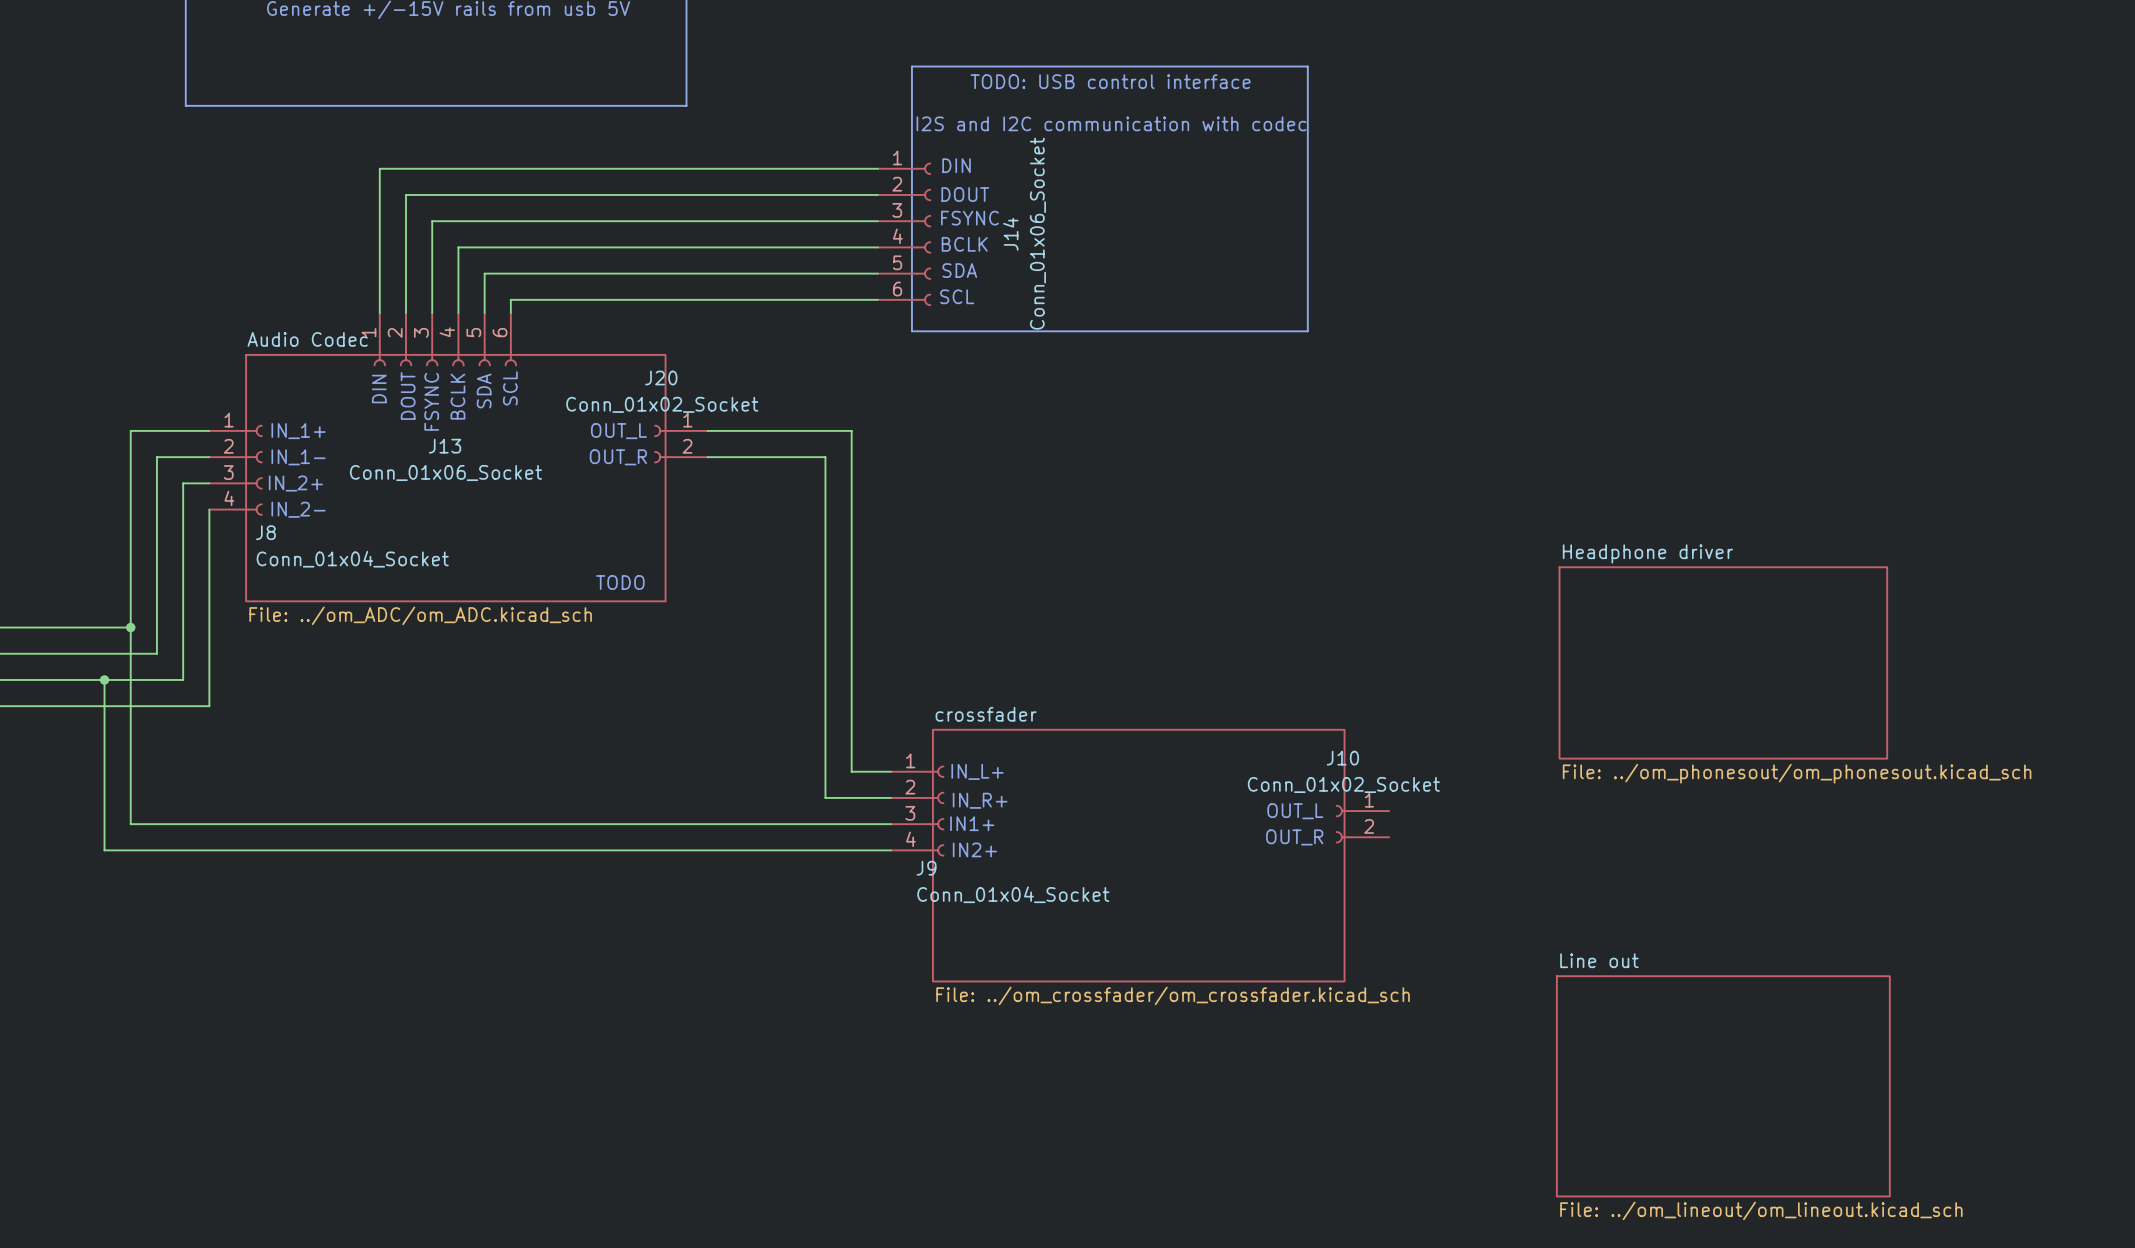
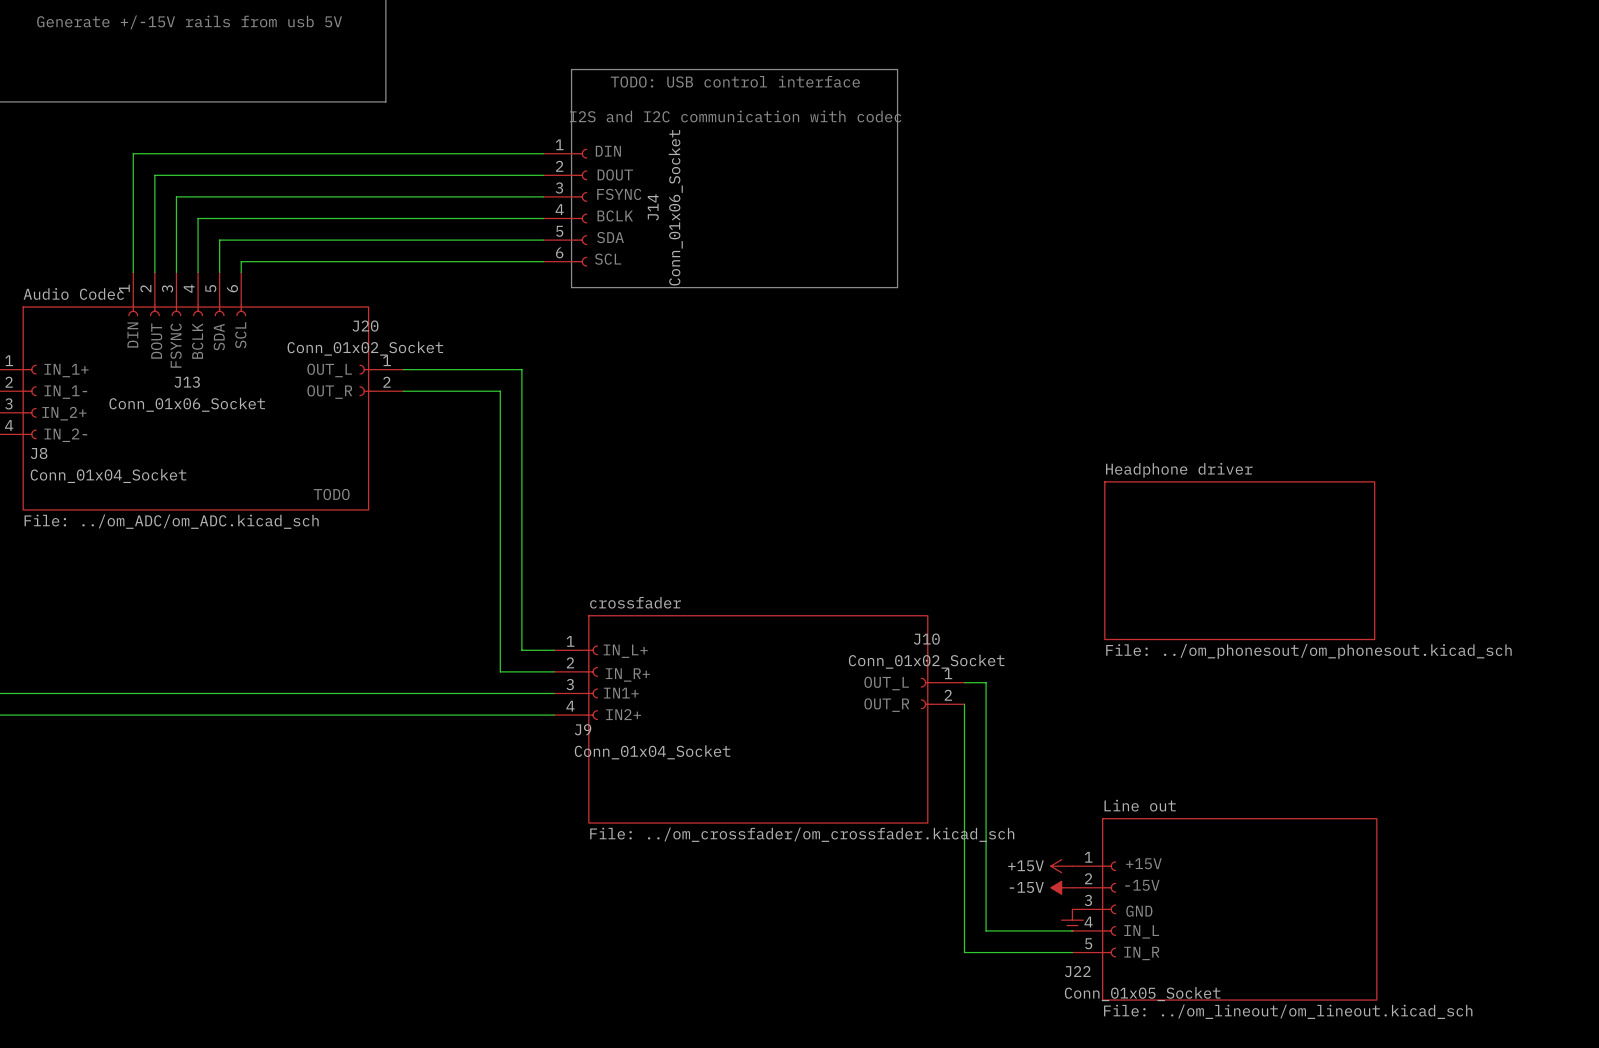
wire: none -> (964, 682) (986, 682) (986, 930) (1072, 930)
wire: none -> (964, 704) (964, 952) (1072, 952)
text: none -> +15V (1143, 863)
power symbol: none -> +15V (1061, 866)
text: none -> -15V (1142, 885)
power symbol: none -> -15V (1061, 887)
J22: none -> Conn_01x05_Socket (1094, 909)
text: none -> GND (1139, 911)
power symbol: none -> (1072, 920)
text: none -> IN_L (1141, 931)
text: none -> IN_R (1141, 953)

